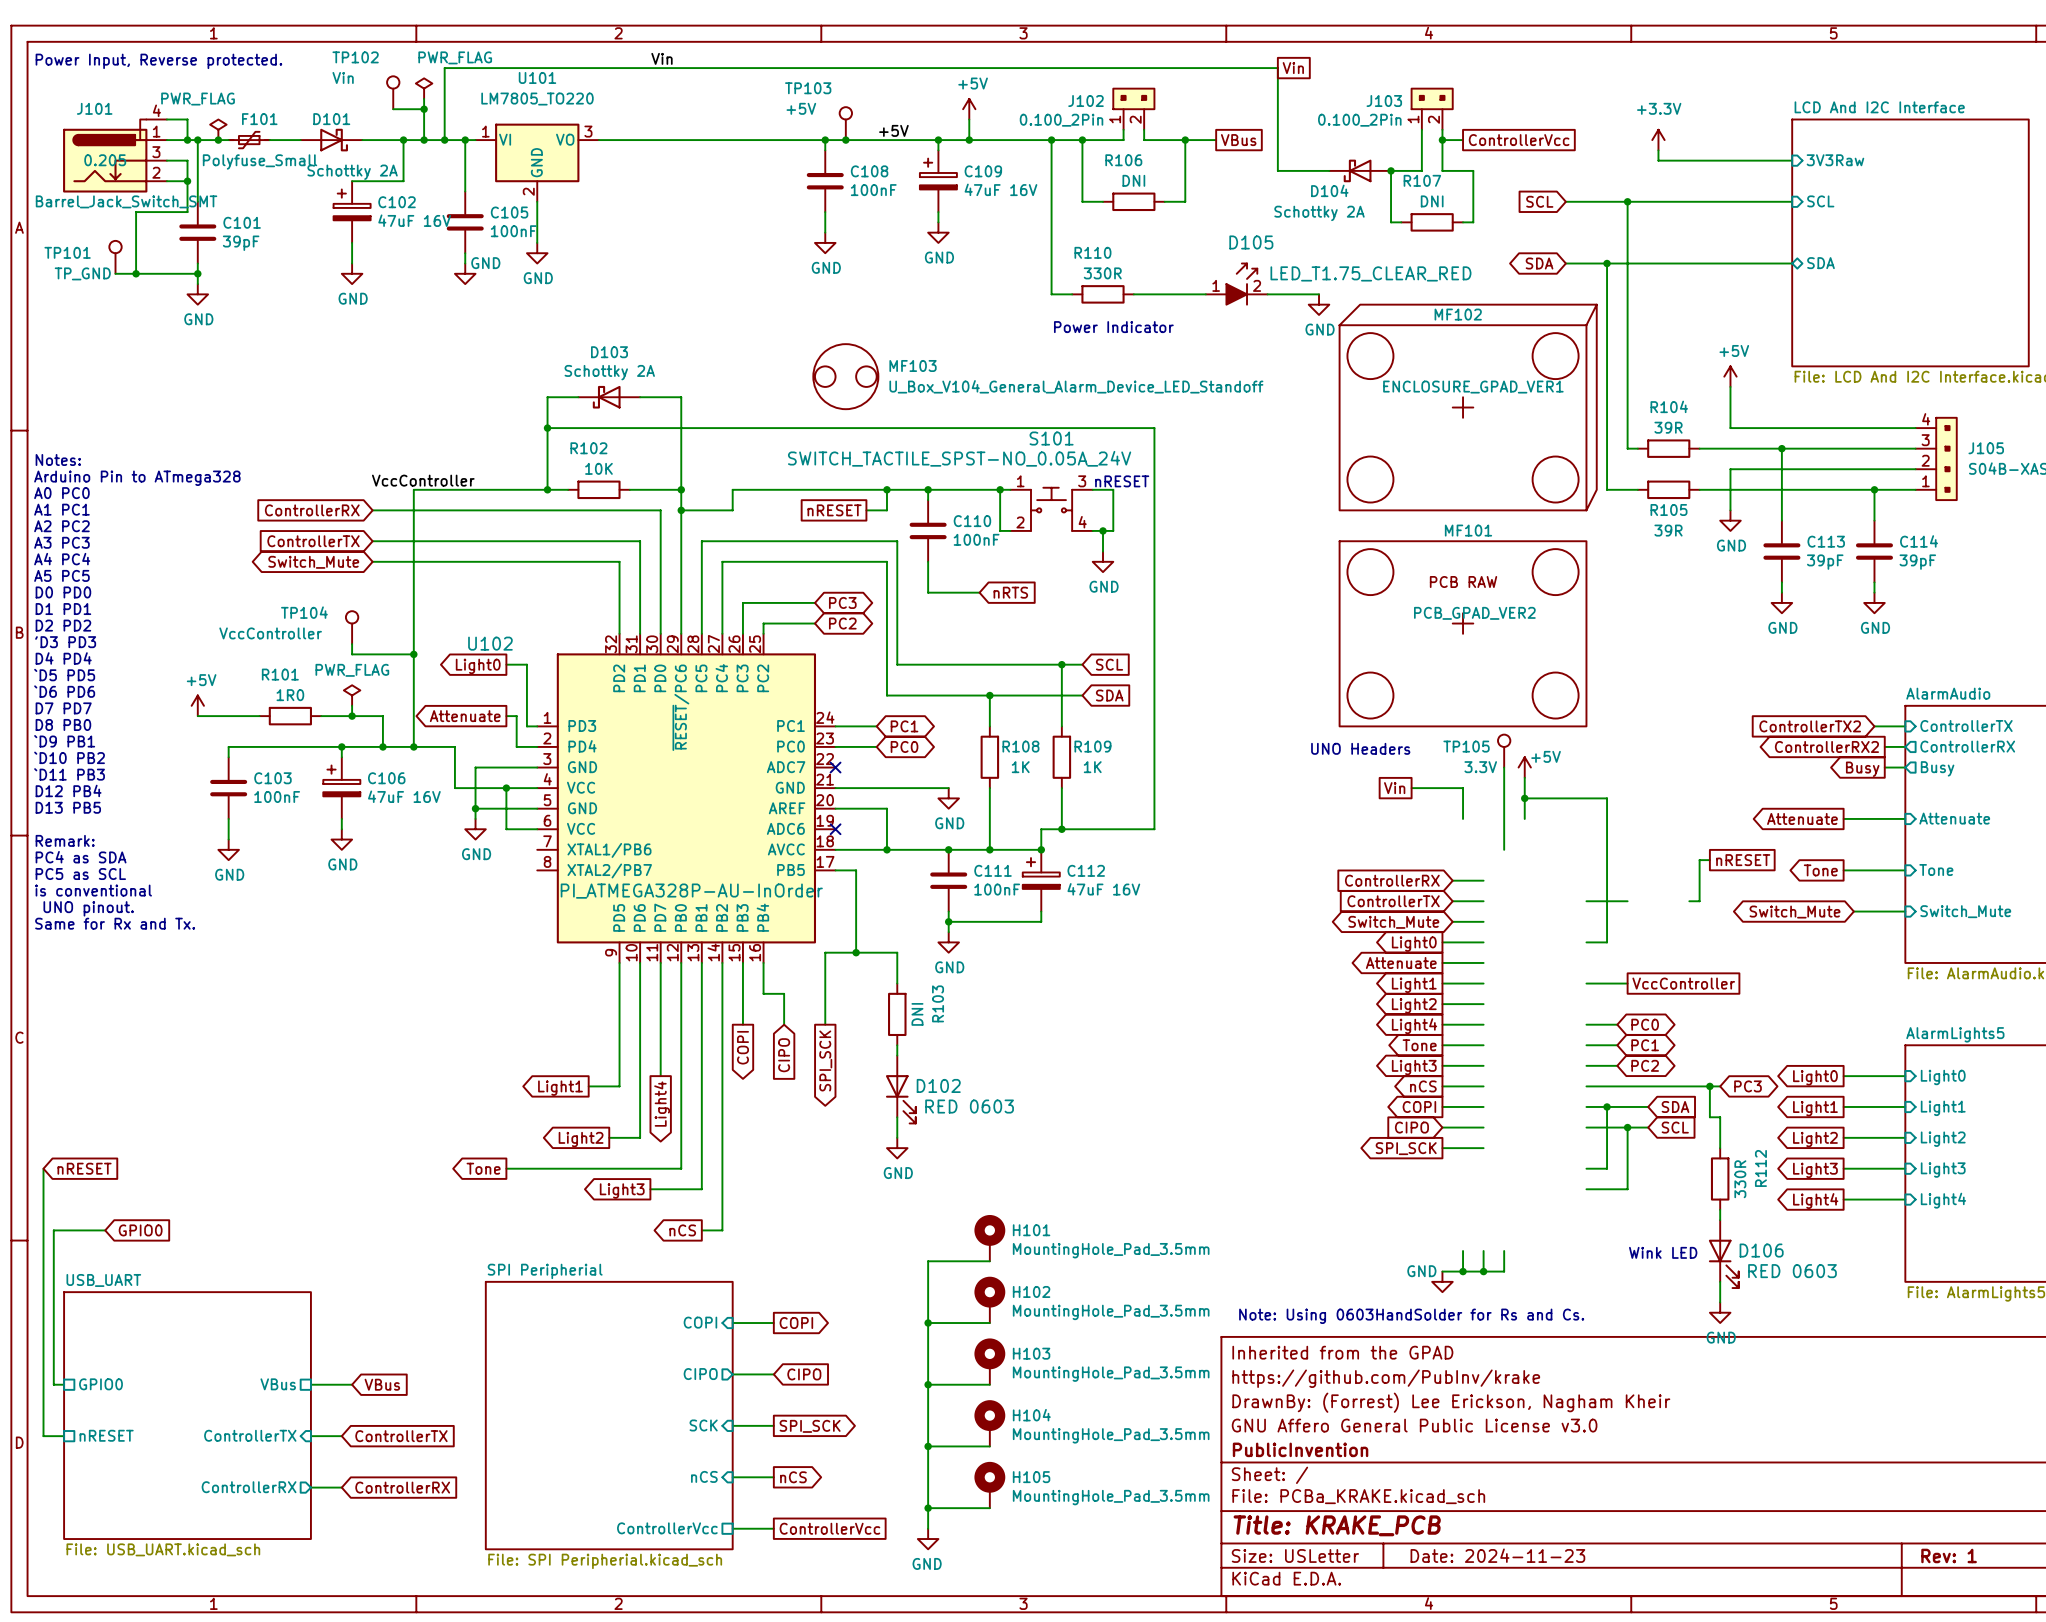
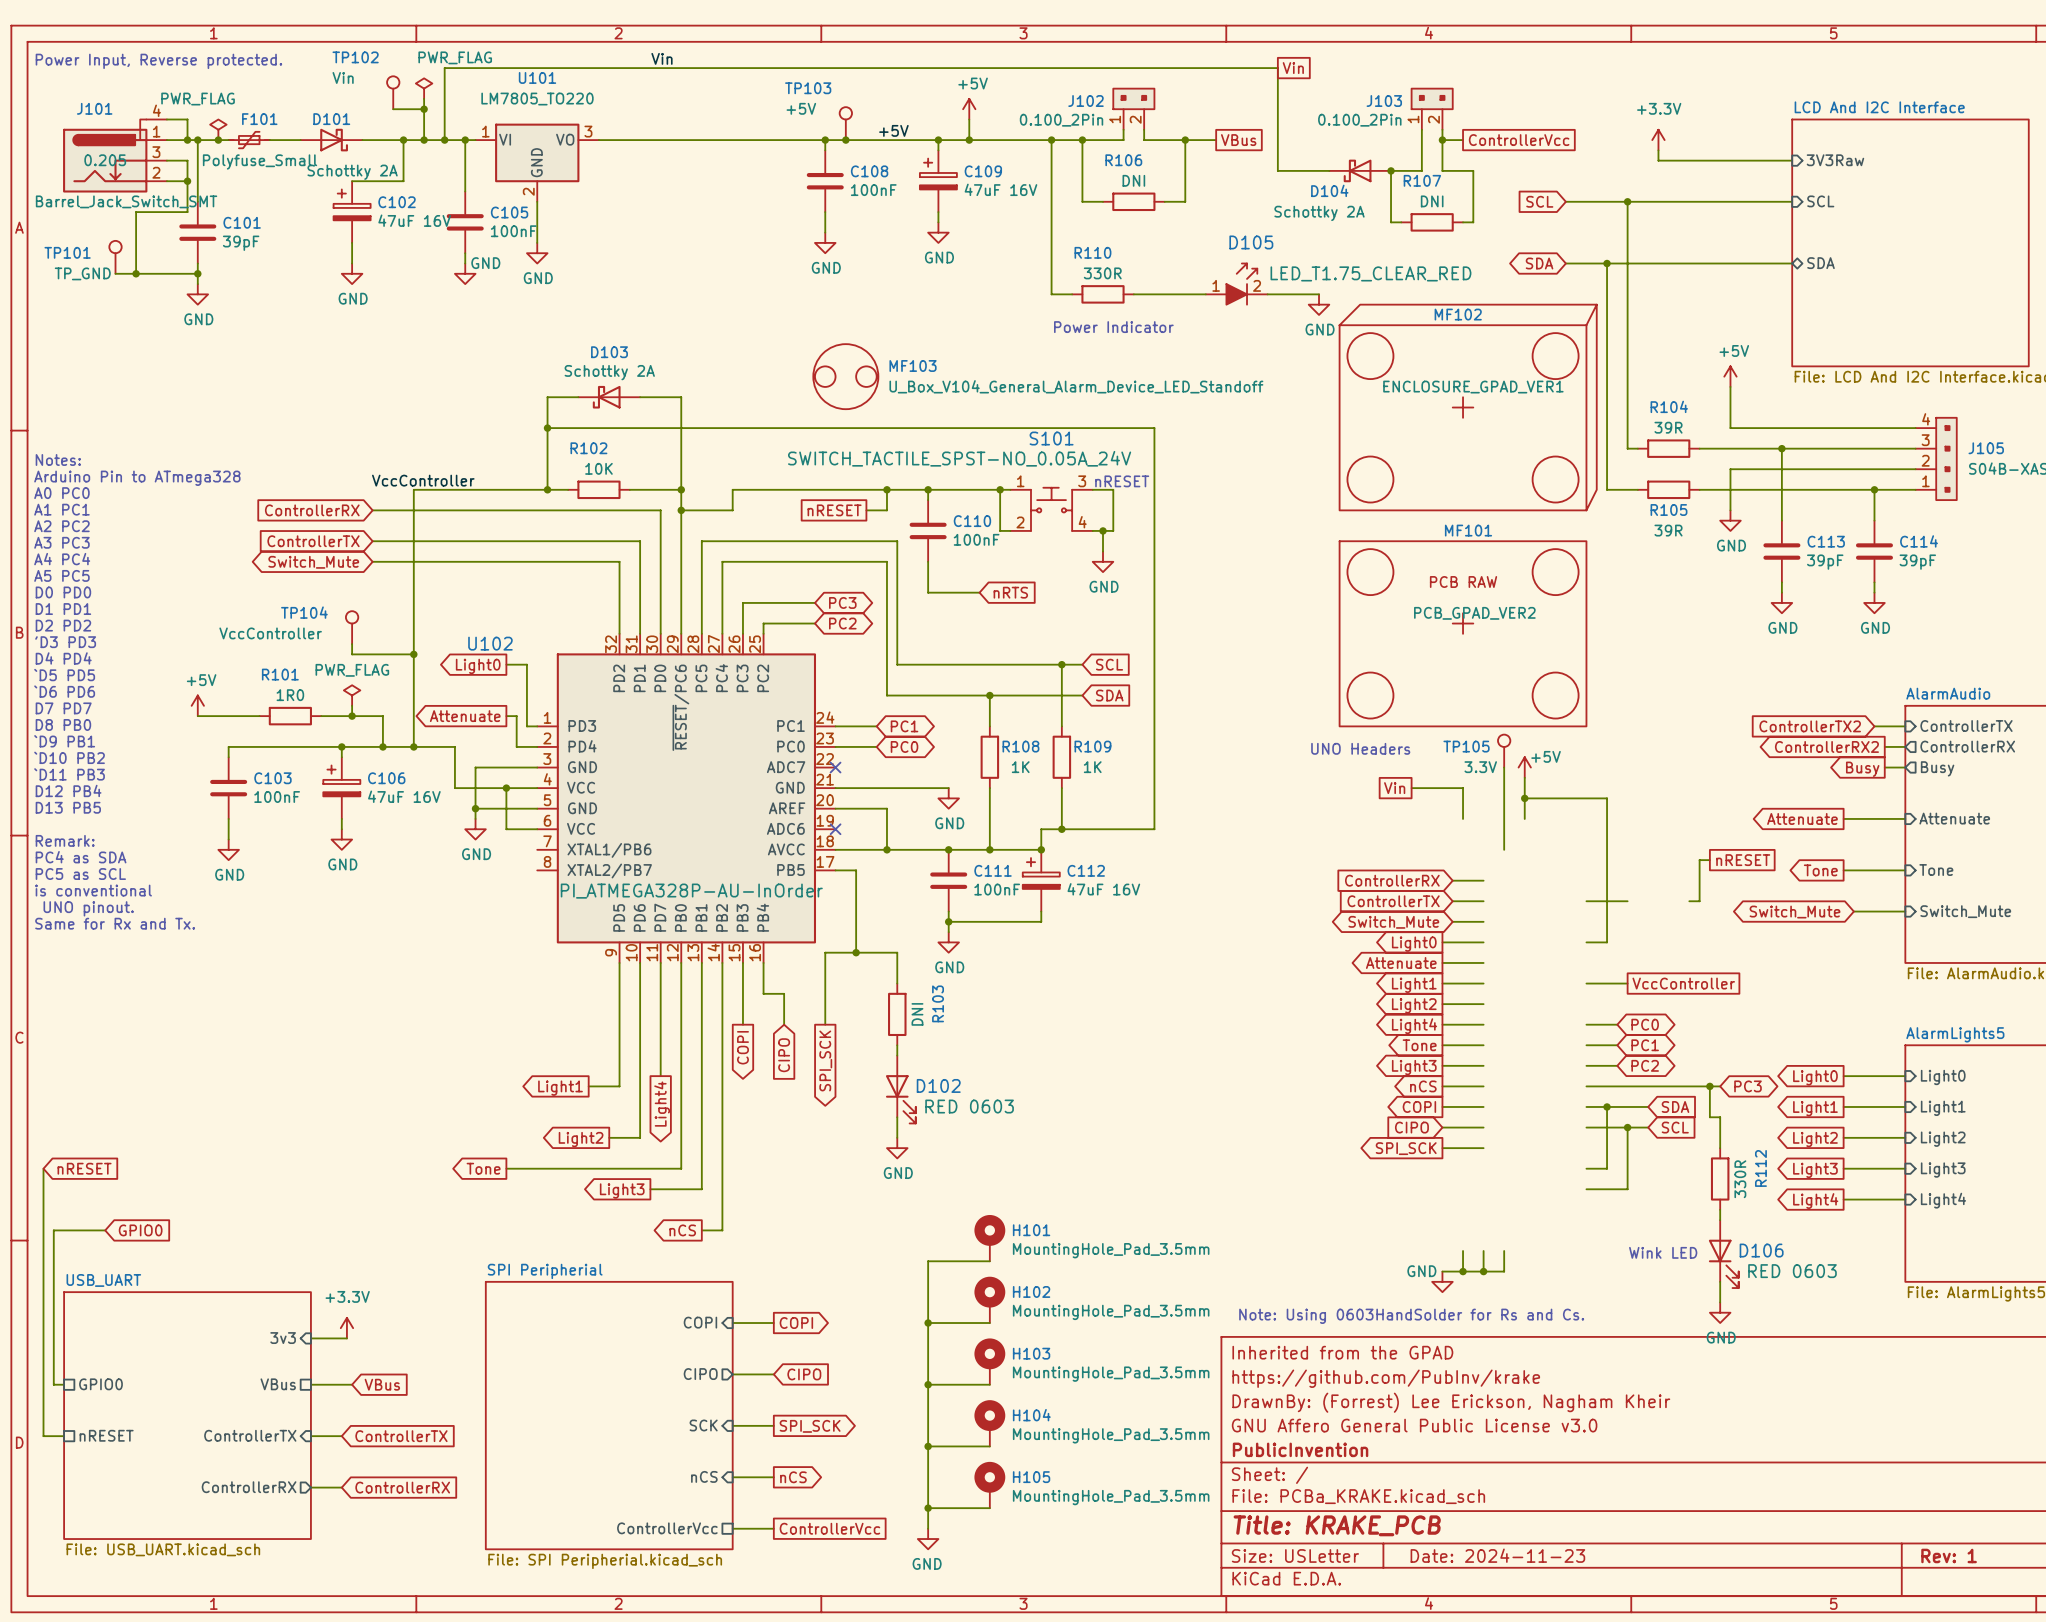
power symbol: none -> +3.3V (346, 1328)
sheet pin: none -> 3v3 (283, 1338)
wire: none -> (310, 1338) (346, 1338)

